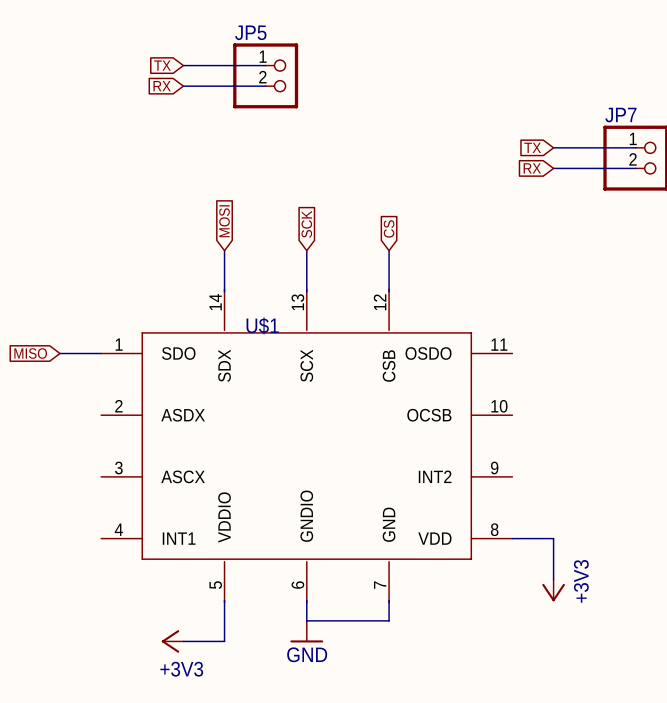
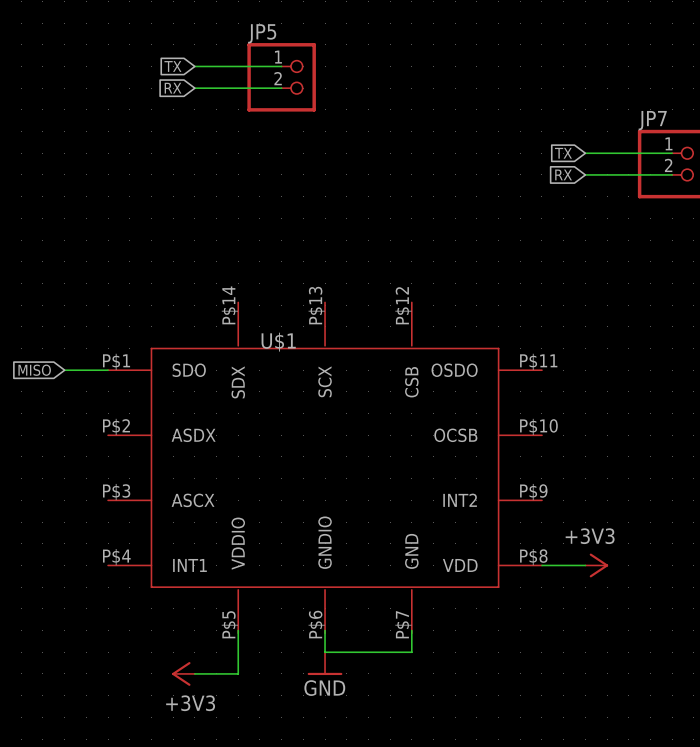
global label: MOSI (224, 221) -> none
global label: SCK (306, 224) -> none
global label: CS (389, 228) -> none
wire: (224, 250) (224, 291) -> none
wire: (306, 250) (306, 291) -> none
wire: (389, 250) (389, 291) -> none
U$1 symbol: [101, 289, 513, 603] -> [108, 302, 542, 634]
wire: (553, 538) (553, 579) -> none
power symbol position: +3V3 (553, 590) -> +3V3 (596, 565)
power symbol rotation: 0° (553, 592) -> 90° counterclockwise (598, 565)

